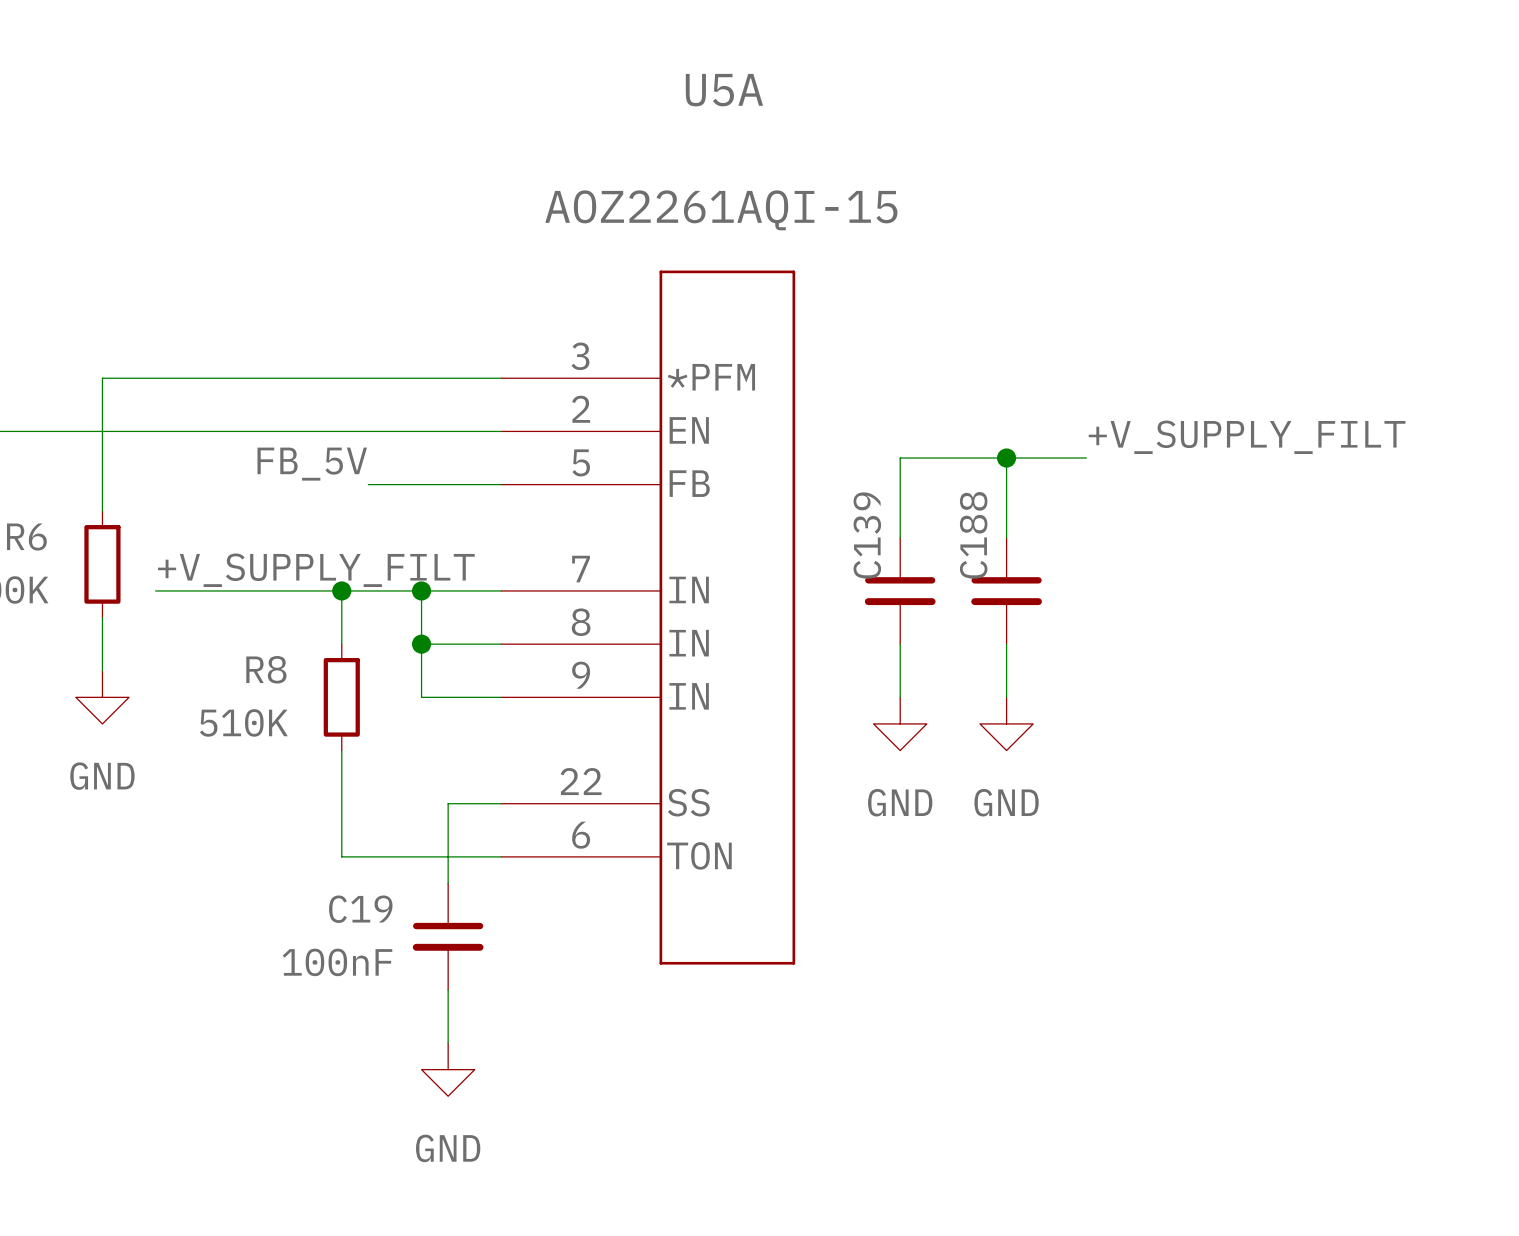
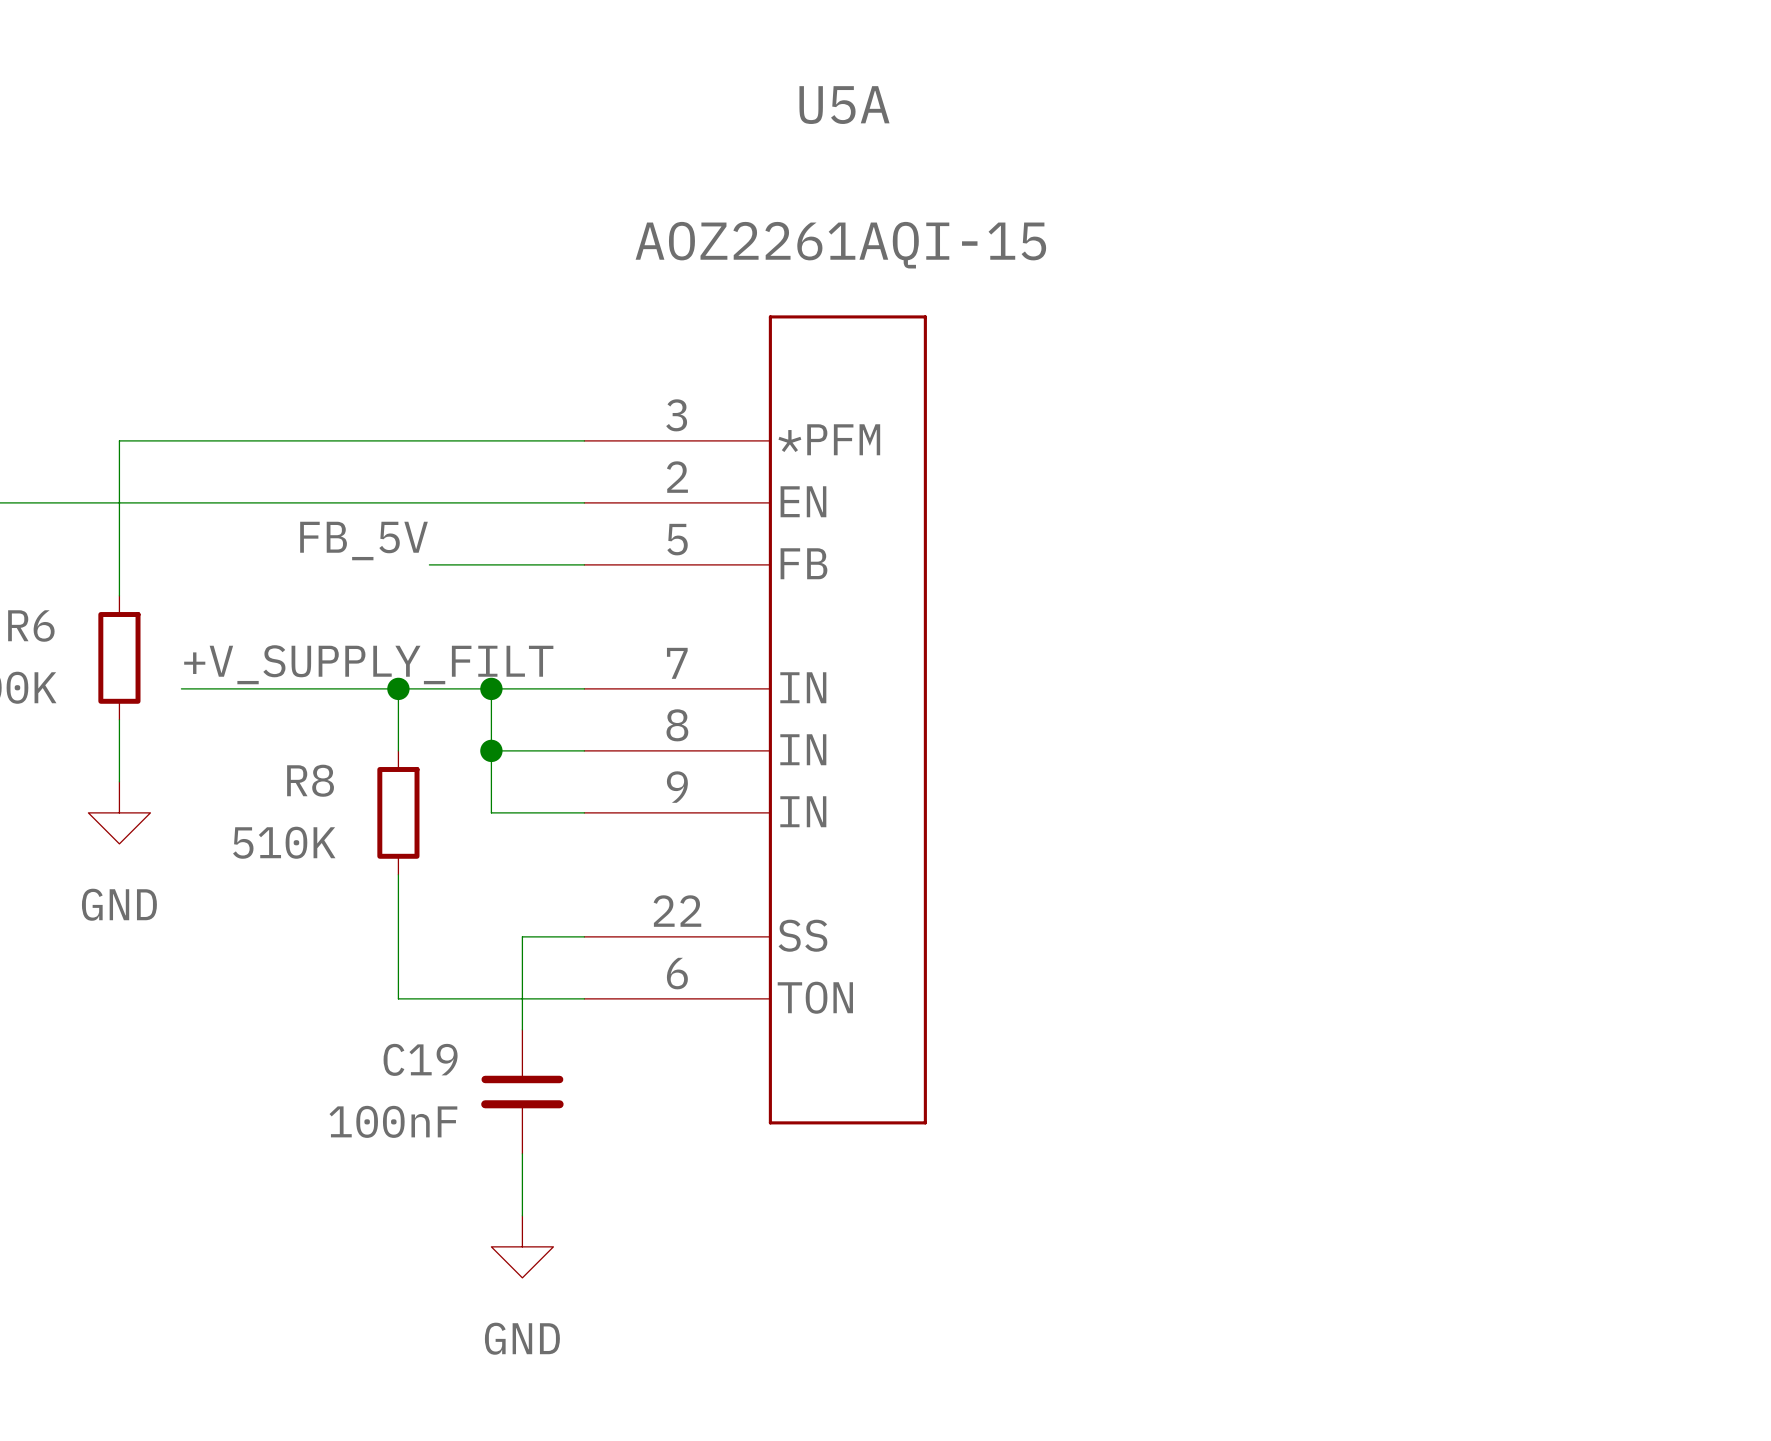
label: +V_SUPPLY_FILT (1247, 437) -> none
wire: (1006, 458) (1006, 537) -> none
junction: (1006, 458) -> none
wire: (1086, 458) (900, 458) (900, 537) -> none
C139: (900, 590) -> none
C188: (1006, 590) -> none
wire: (900, 644) (900, 697) -> none
wire: (1006, 644) (1006, 697) -> none
power symbol: GND (900, 723) -> none
power symbol: GND (1006, 723) -> none

